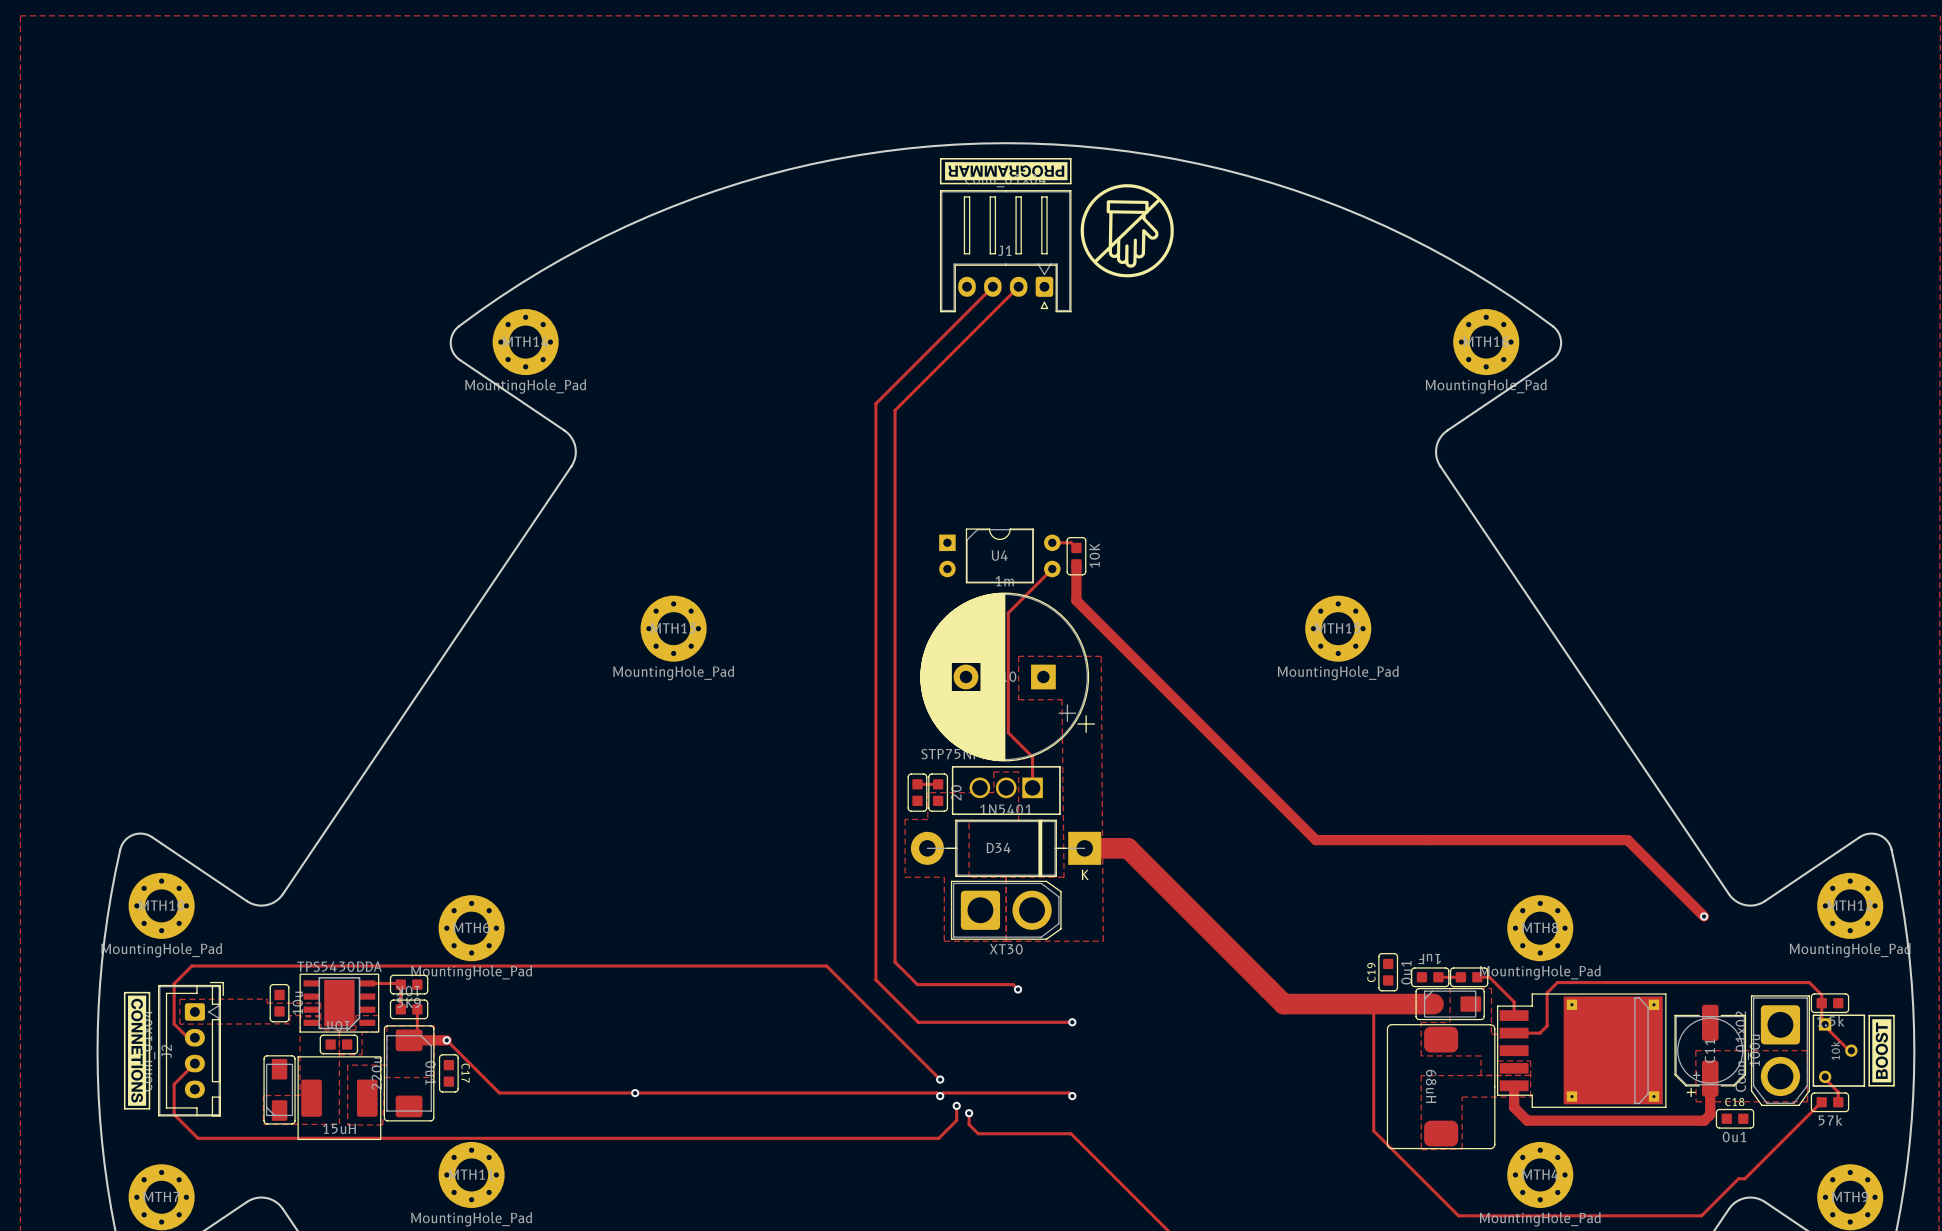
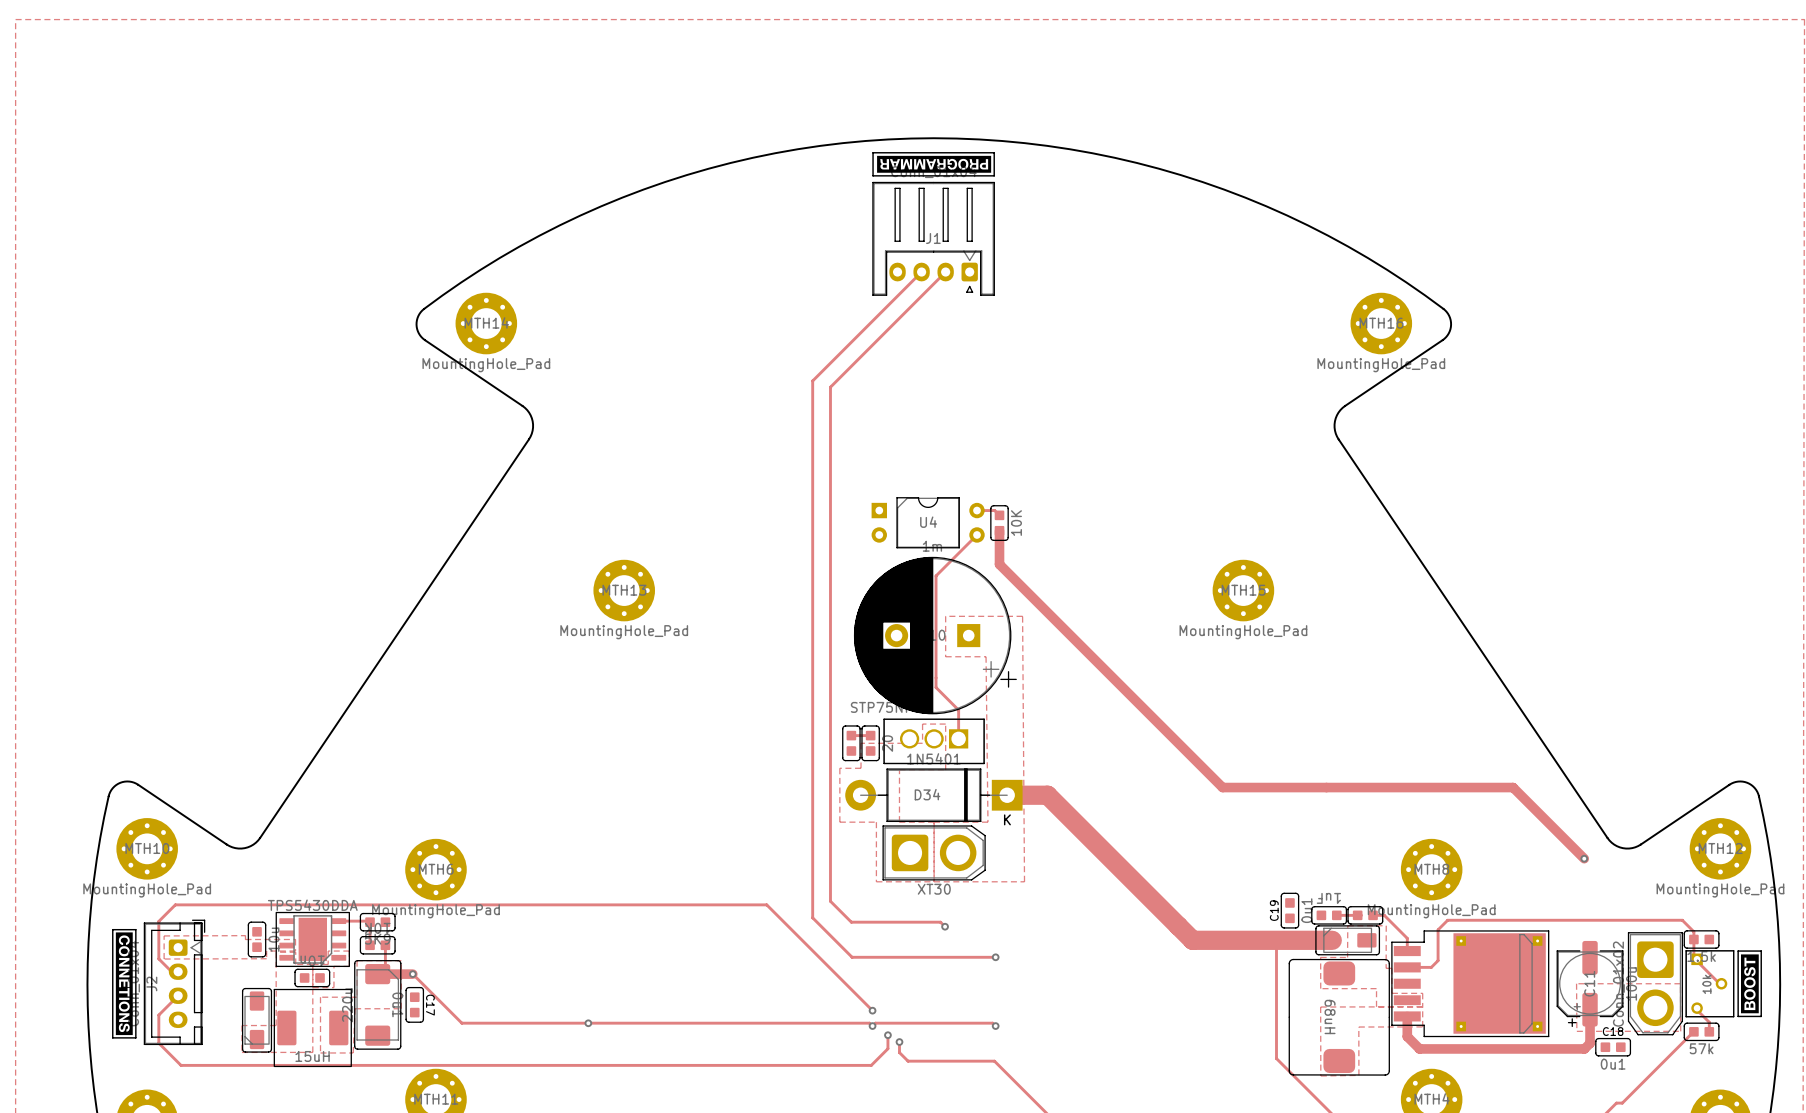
drawing: [1080, 184, 1174, 278] -> none

